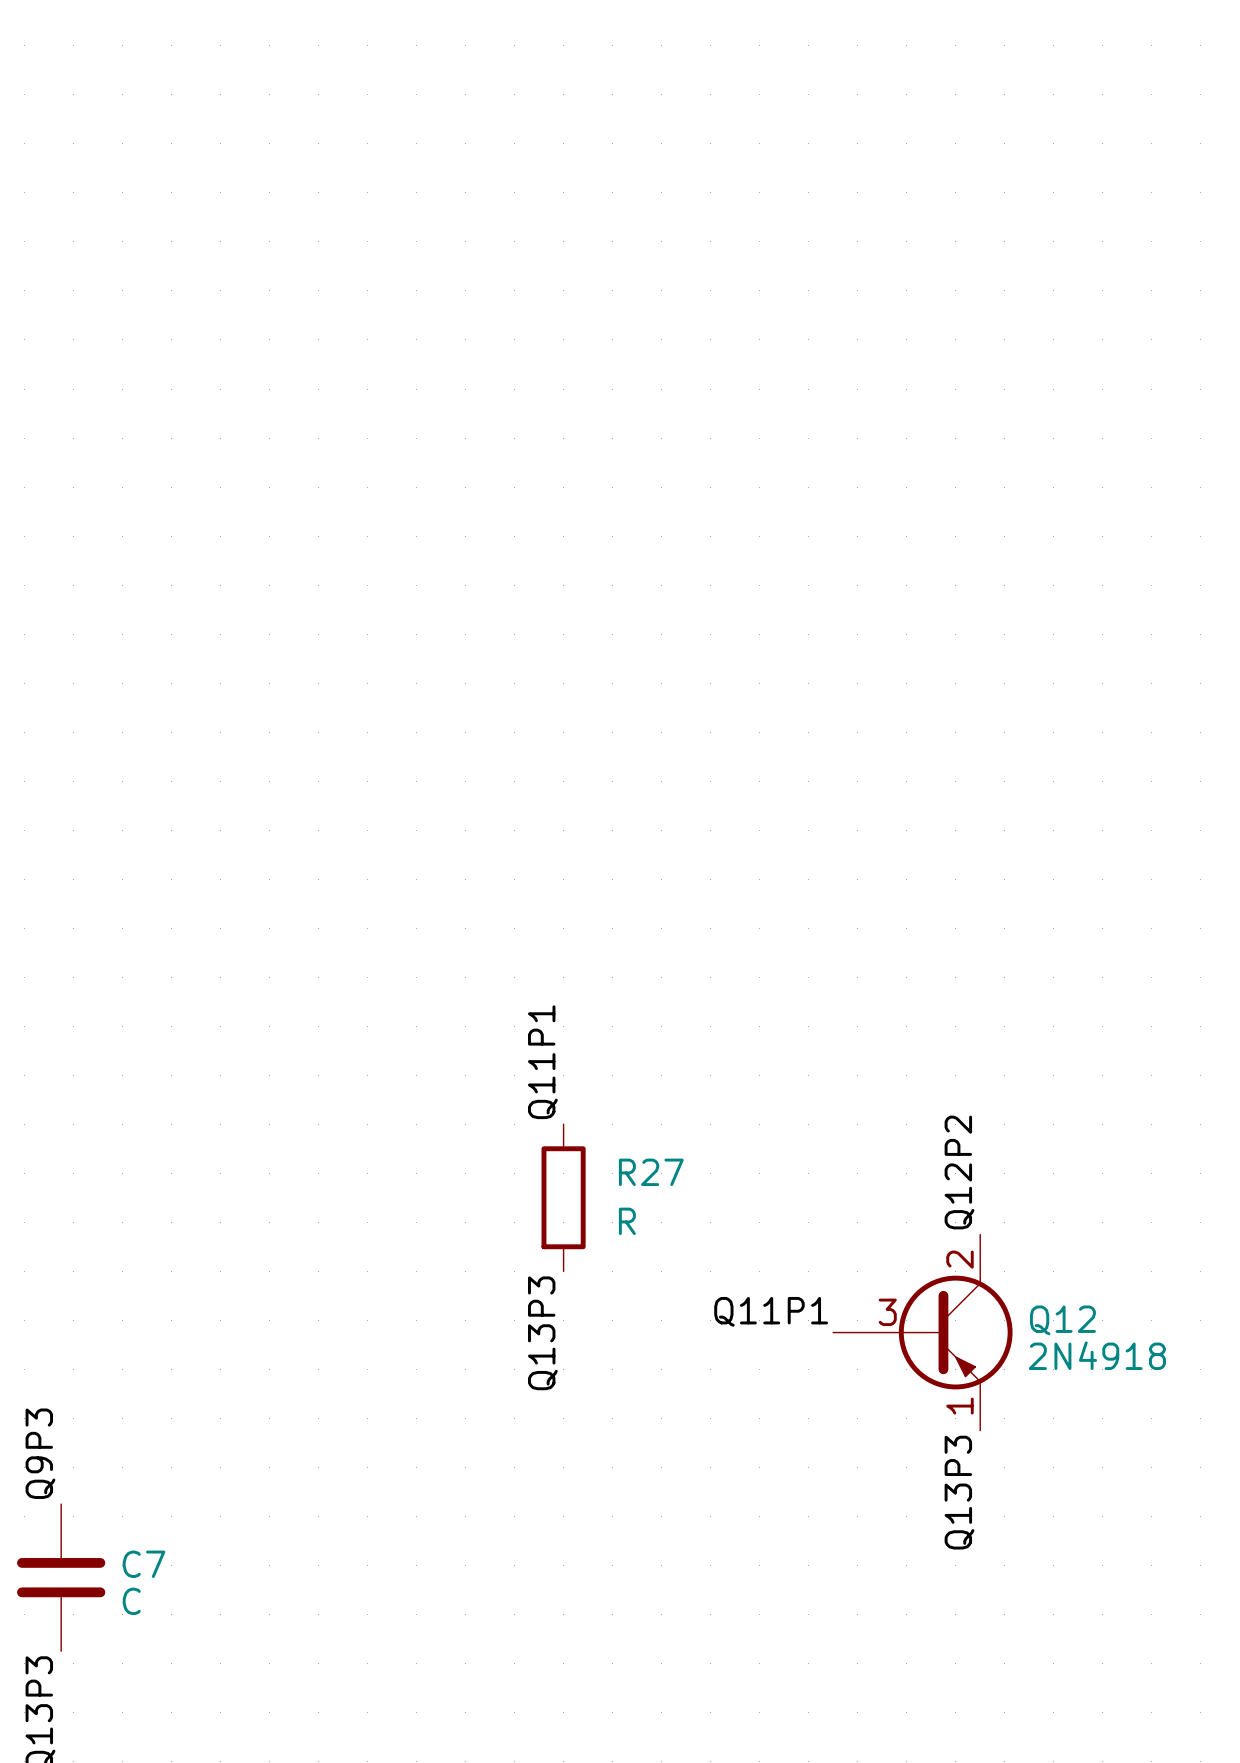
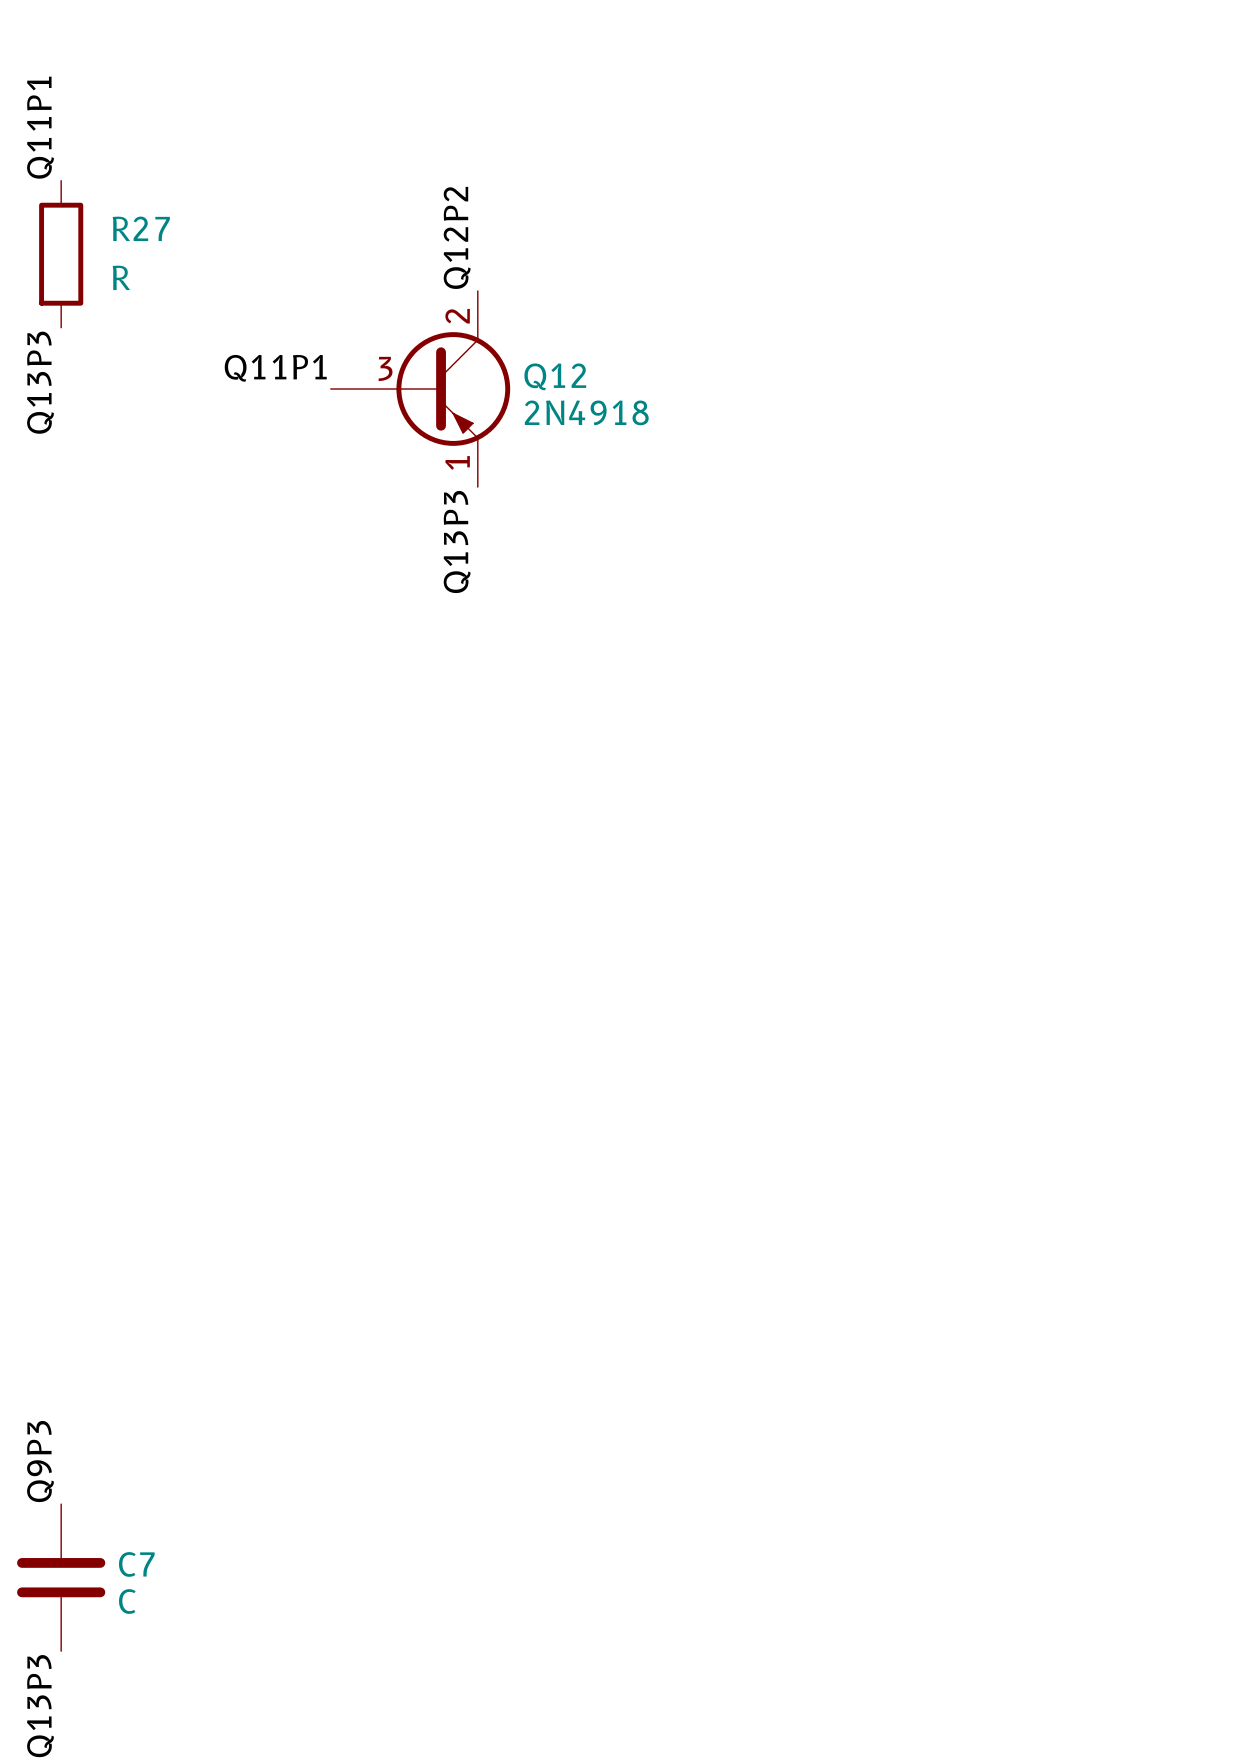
label: none -> Q11P1 (40, 127)
label: none -> Q12P2 (457, 237)
label: none -> Q11P1 (275, 368)
label: none -> Q13P3 (40, 382)
label: none -> Q13P3 (457, 542)
label: Q11P1 (542, 1062) -> none
label: Q12P2 (959, 1172) -> none
R27 position: (563, 1197) -> (61, 254)
label: Q11P1 (771, 1311) -> none
Q12 position: (922, 1332) -> (420, 389)
label: Q13P3 (542, 1333) -> none
label: Q13P3 (959, 1492) -> none

